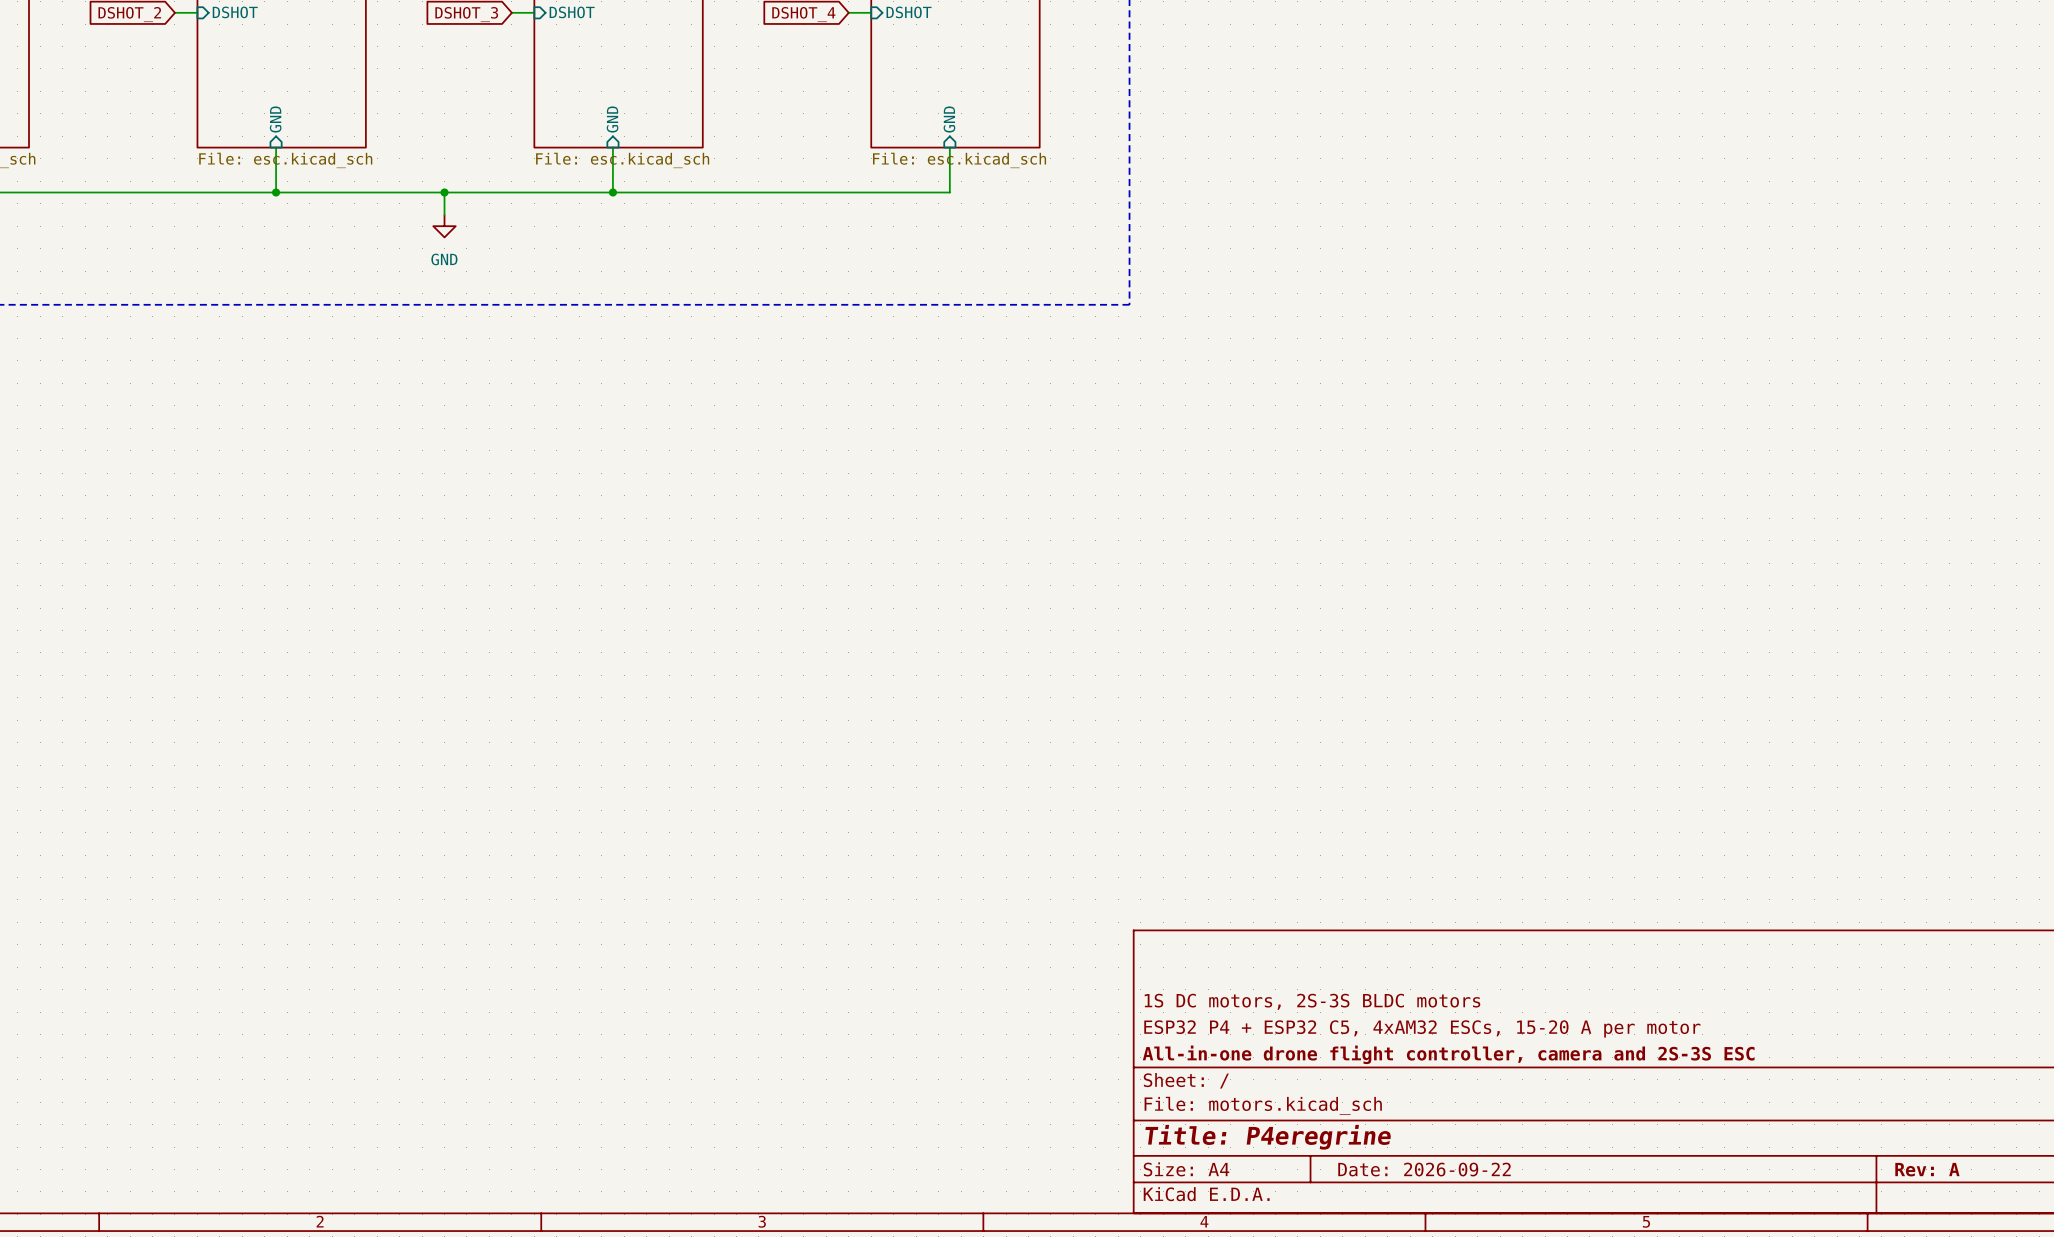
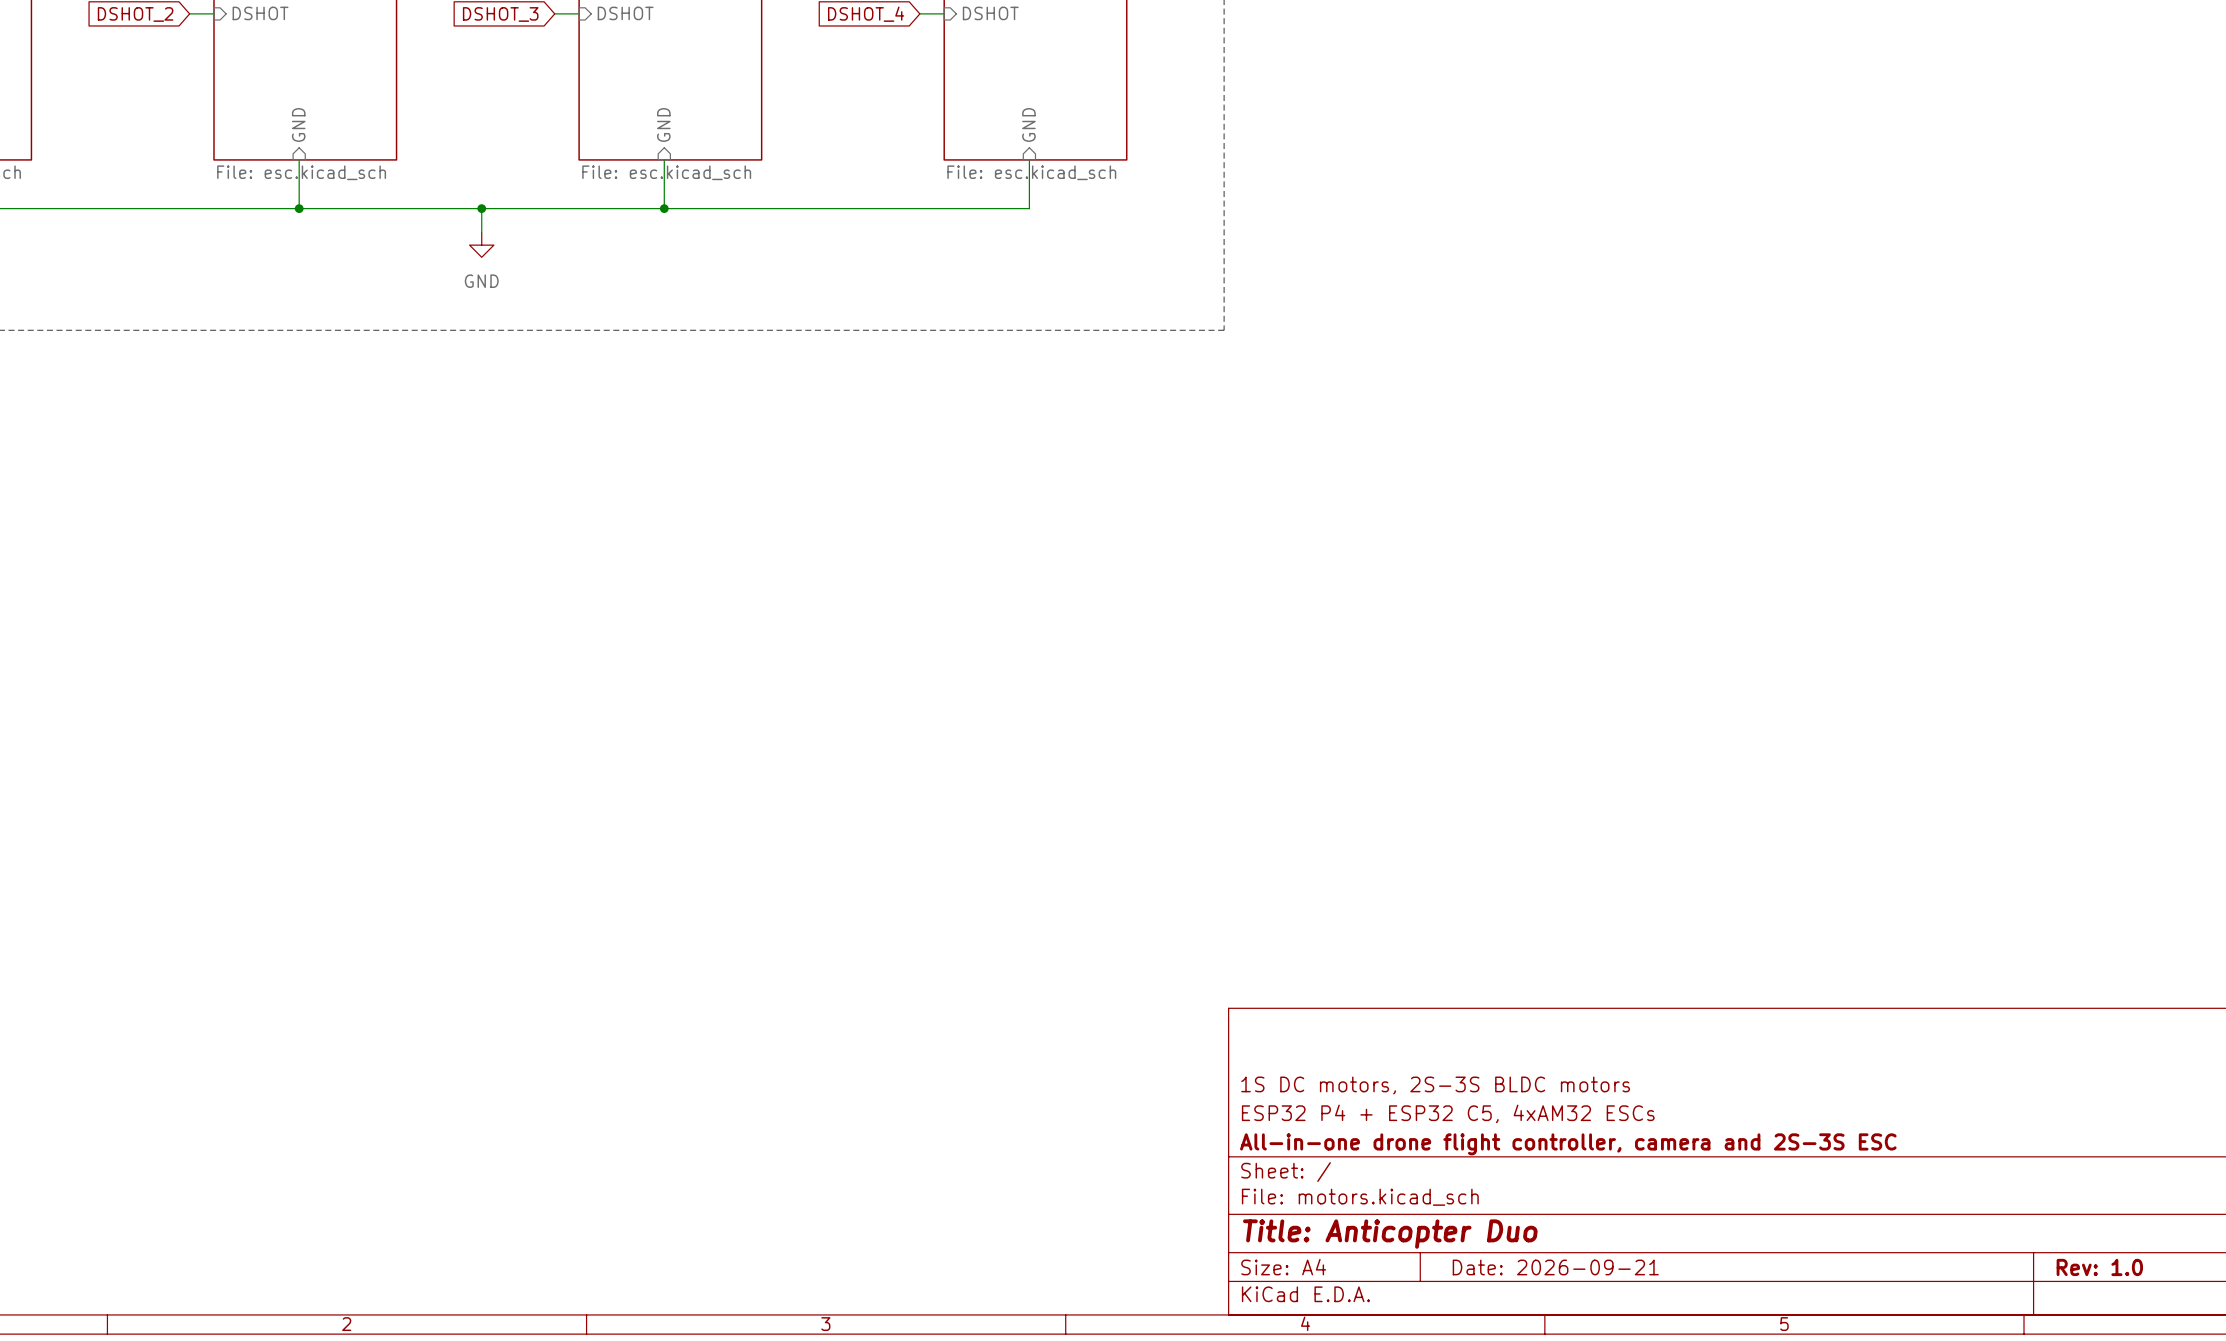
title block: ESP32 P4 + ESP32 C5, 4xAM32 ESCs, 15-20 A per motor (1422, 1028) -> ESP32 P4 + ESP32 C5, 4xAM32 ESCs (1448, 1113)
title block: Title: P4eregrine (1268, 1137) -> Title: Anticopter Duo (1390, 1234)
title block: Date: 2026-09-22 (1424, 1169) -> Date: 2026-09-21 (1555, 1267)
title block: Rev: A (1927, 1169) -> Rev: 1.0 (2099, 1267)

